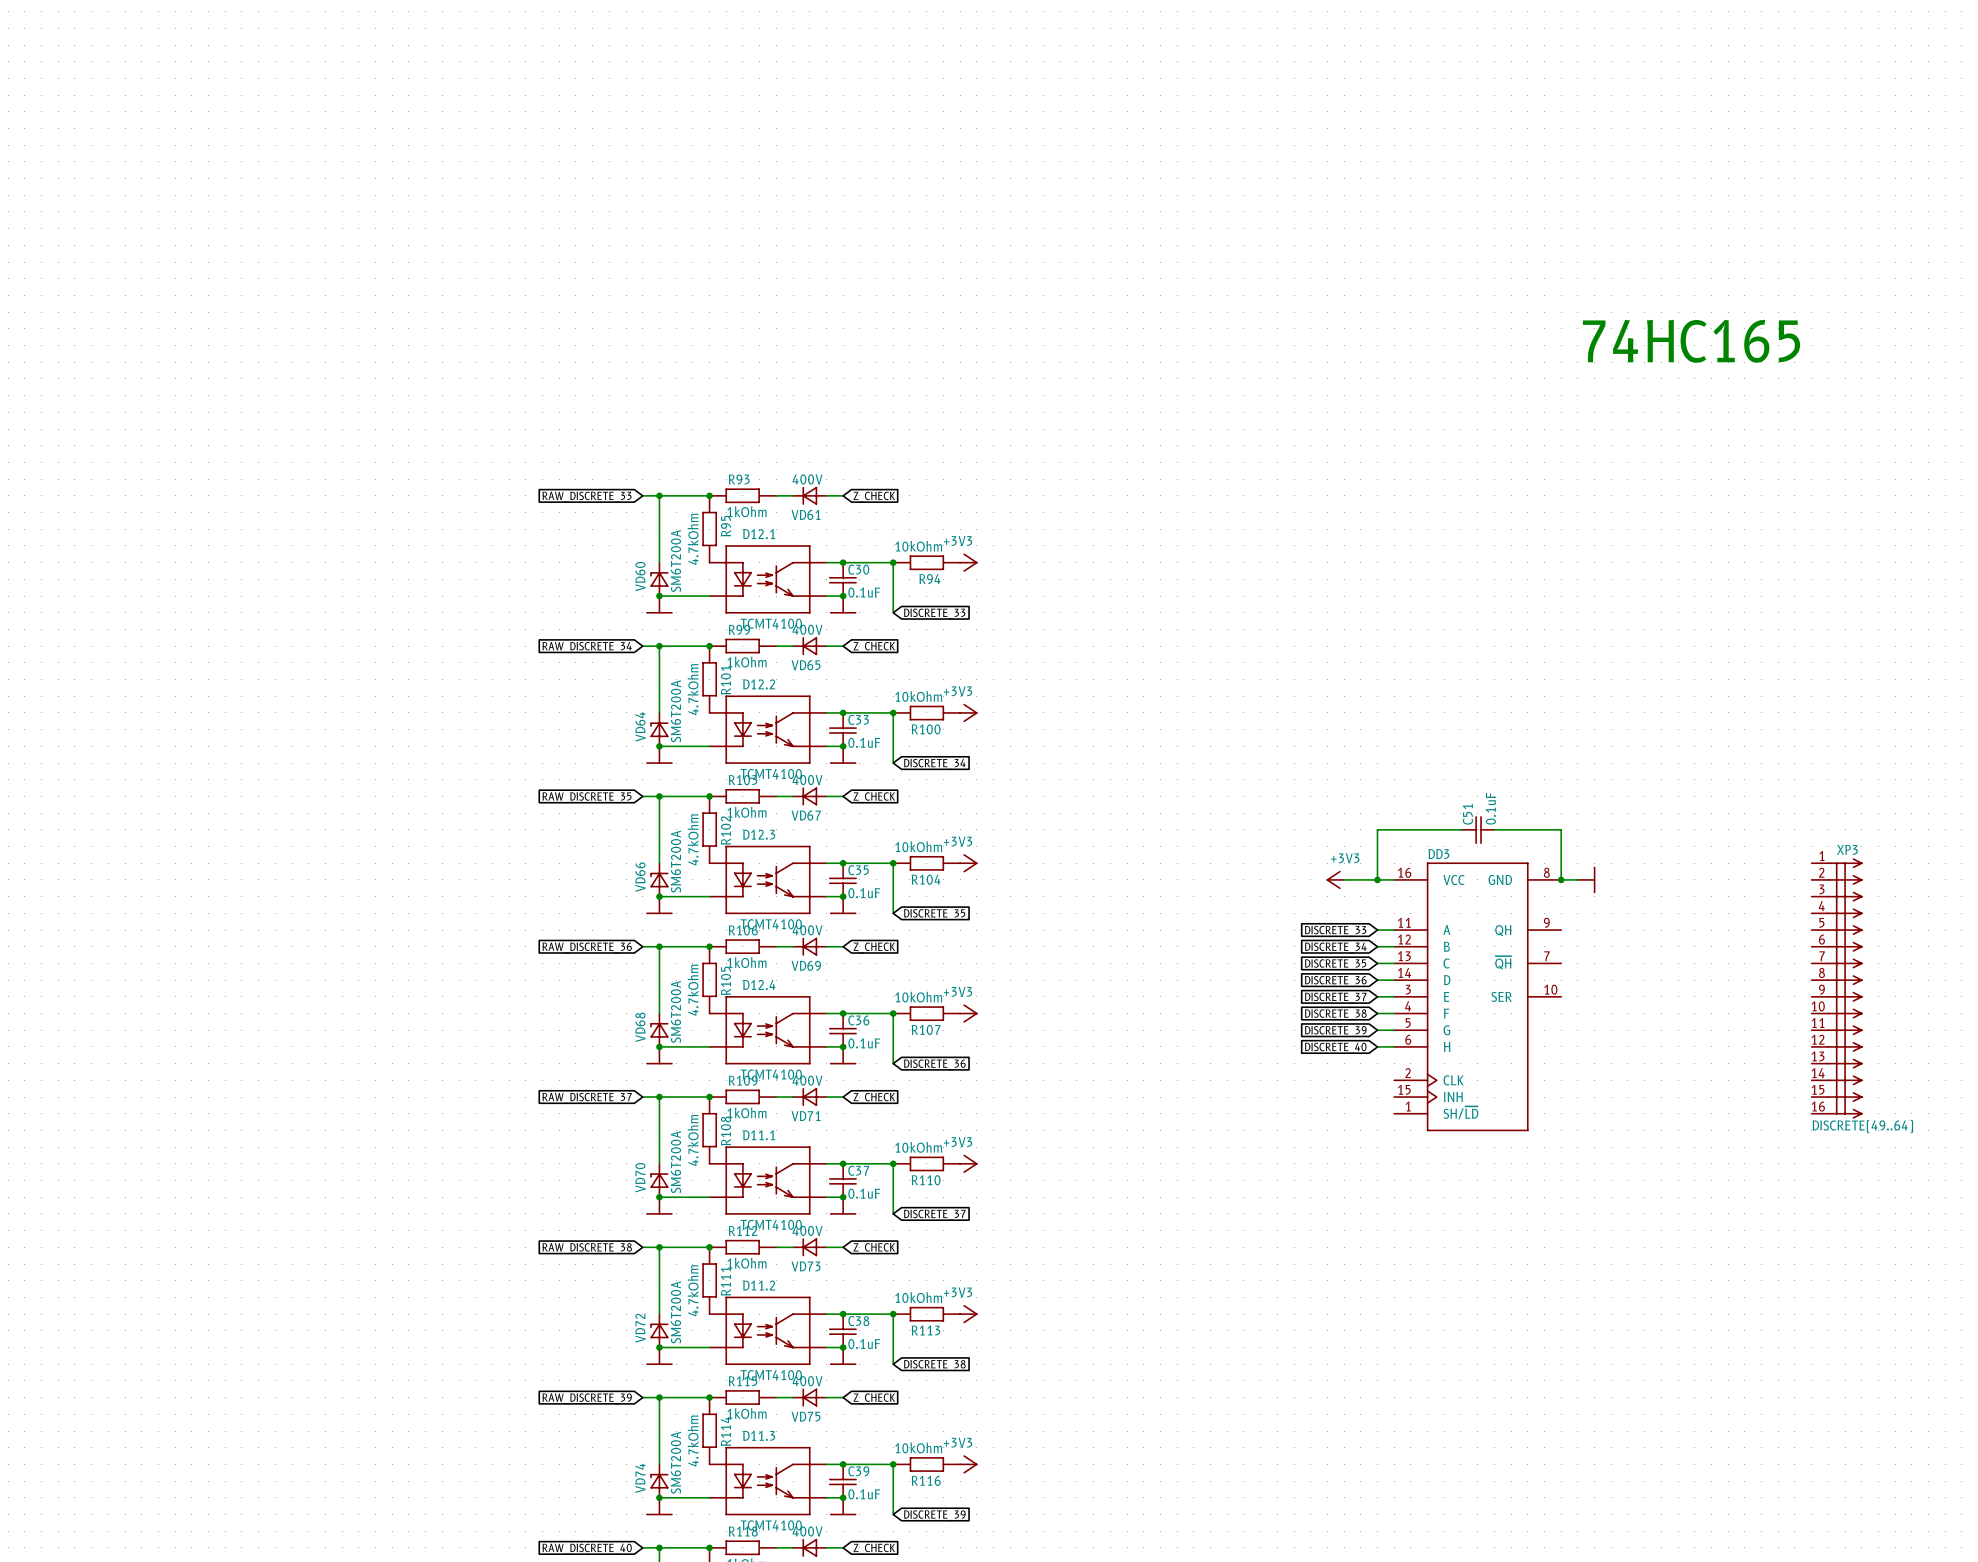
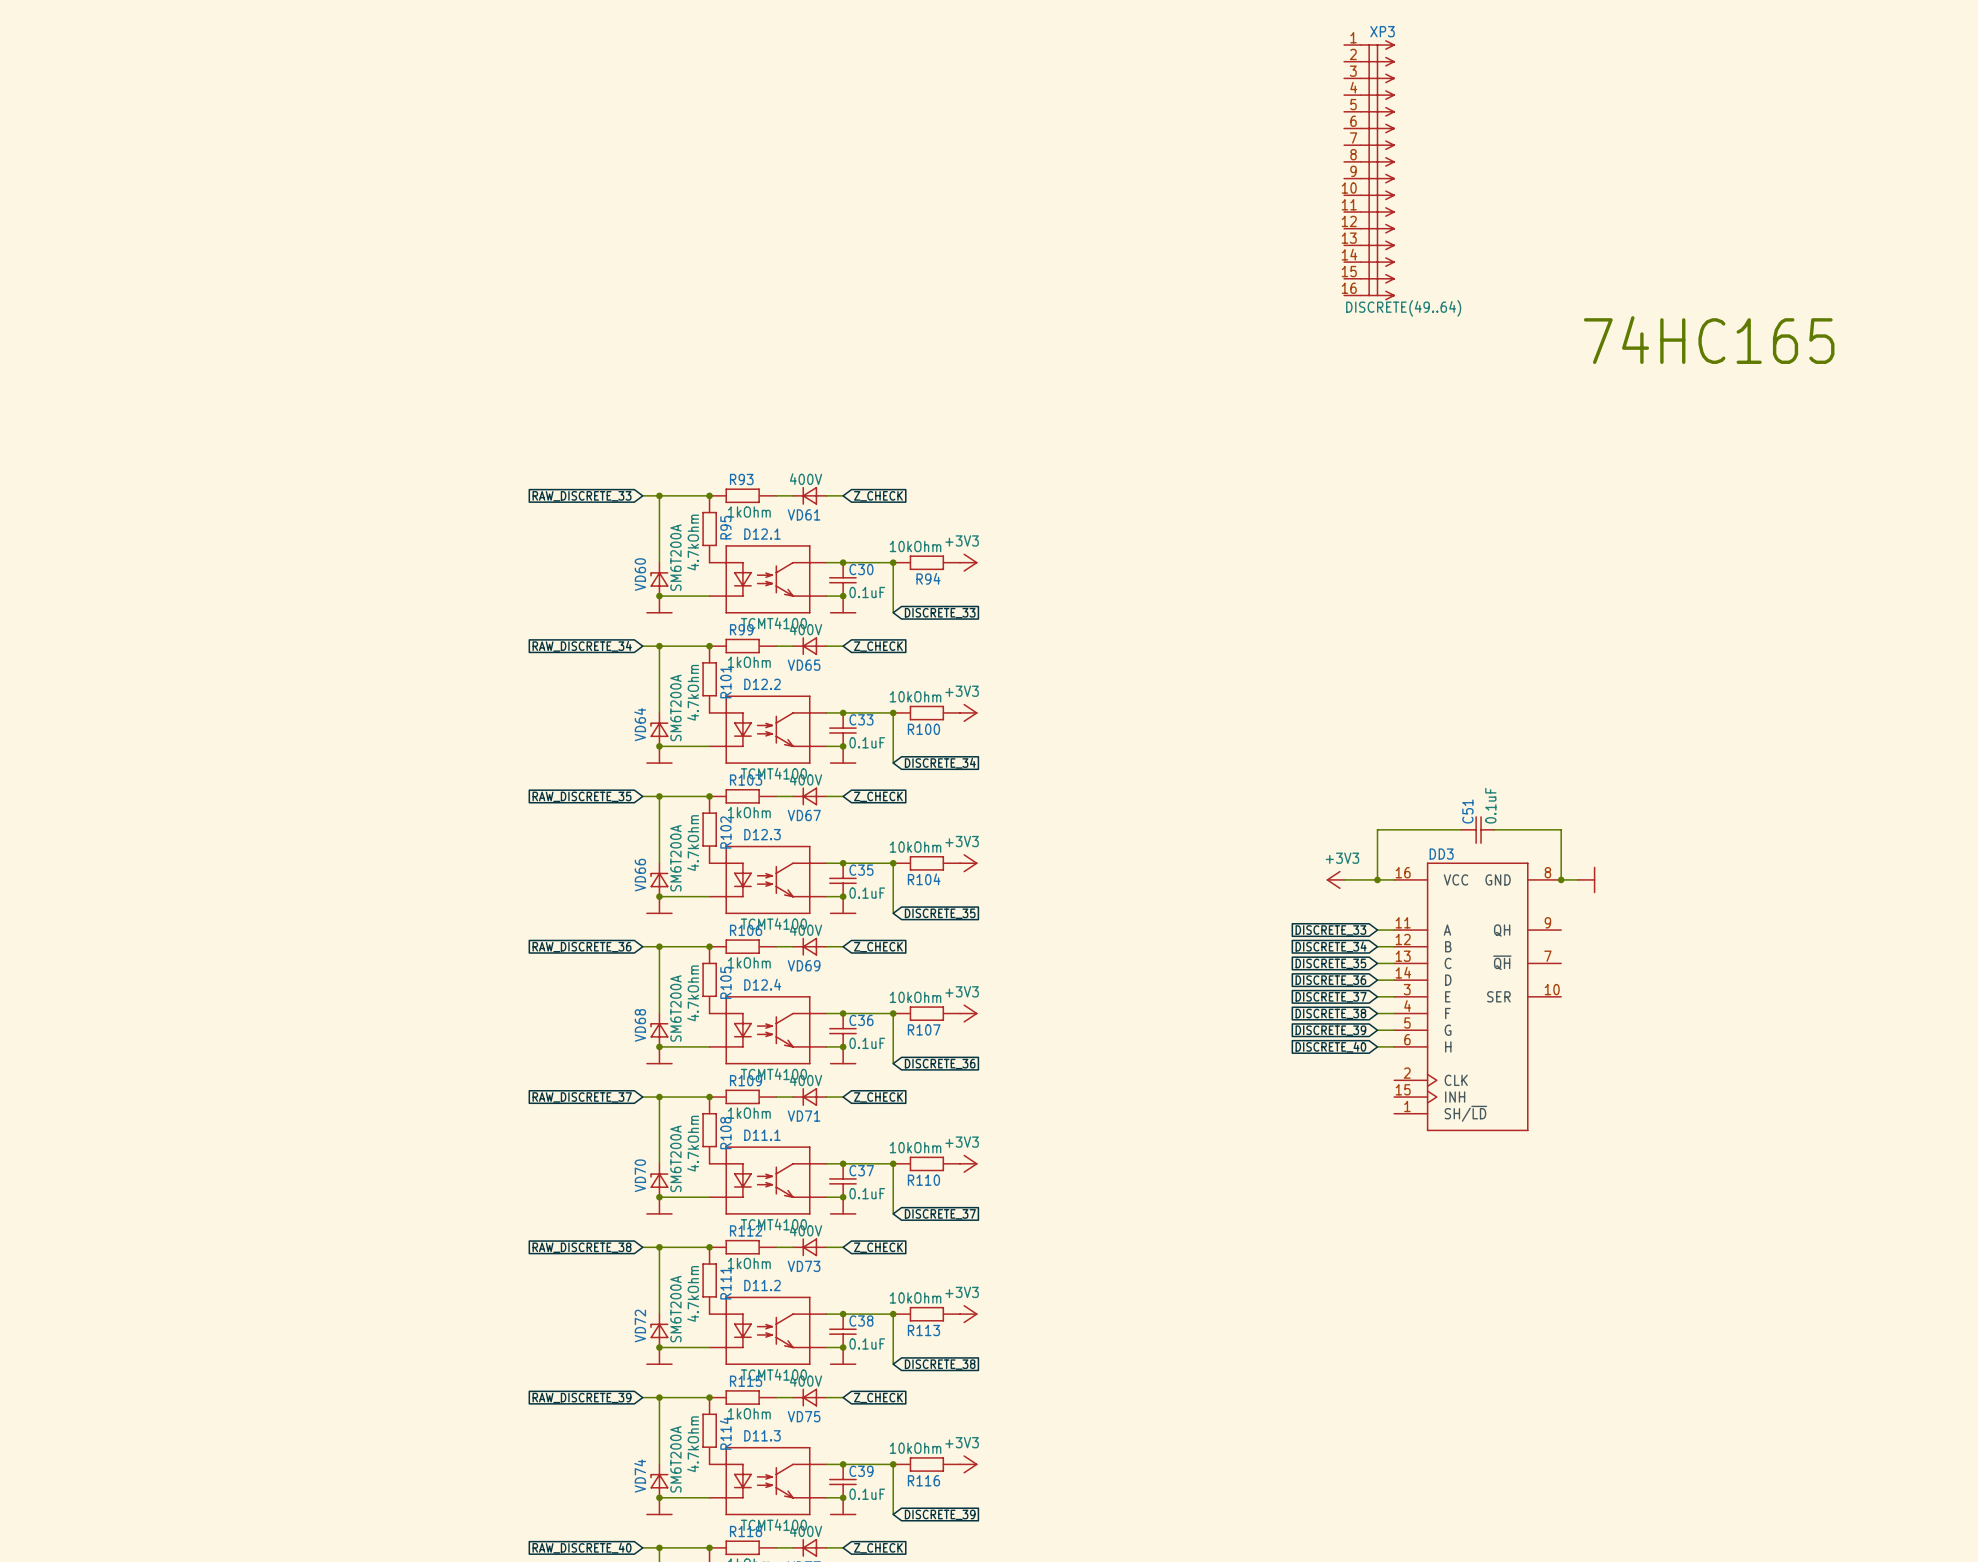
XP3 position: (1836, 988) -> (1369, 170)

